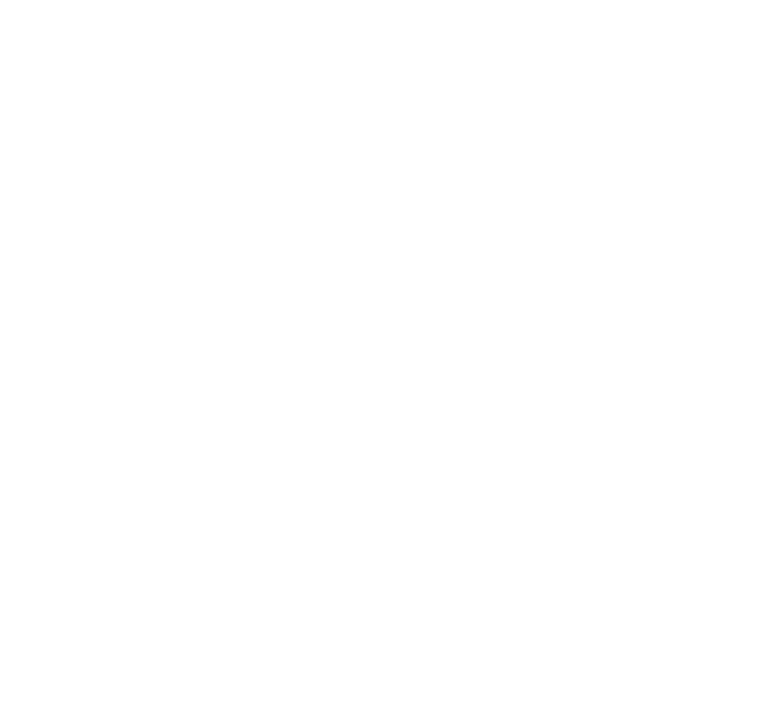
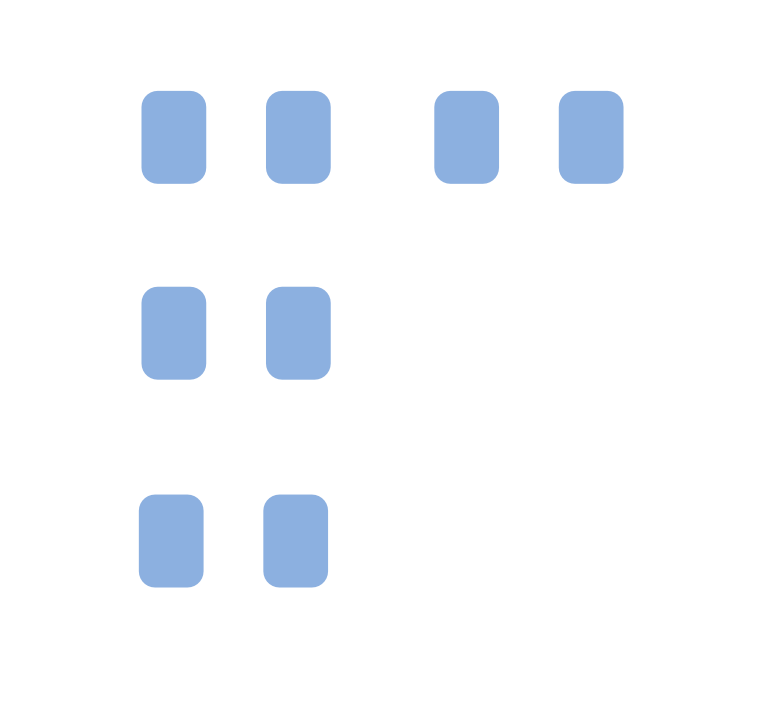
part: none -> (236, 137)
part: none -> (528, 137)
part: none -> (236, 333)
part: none -> (233, 541)

